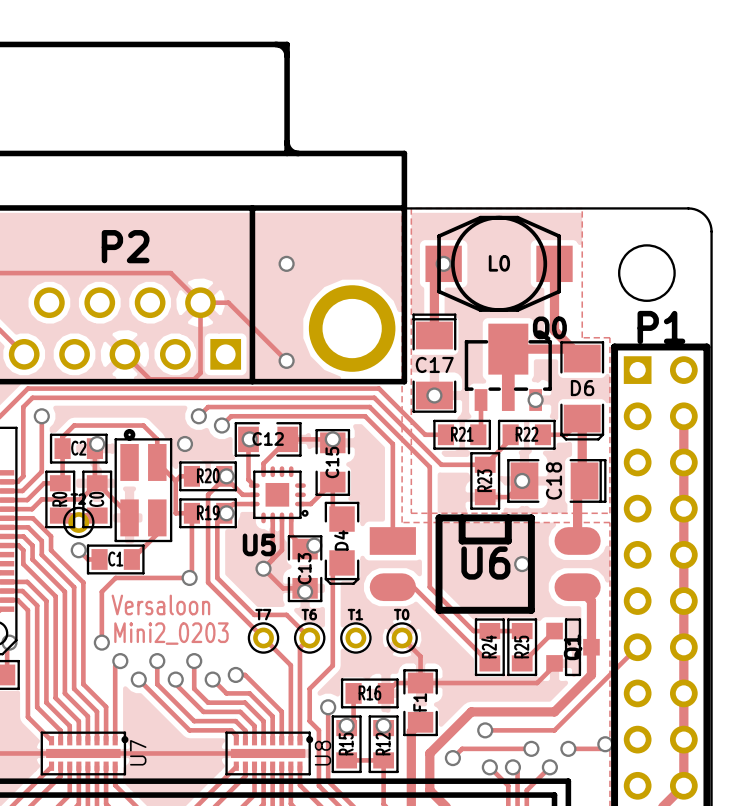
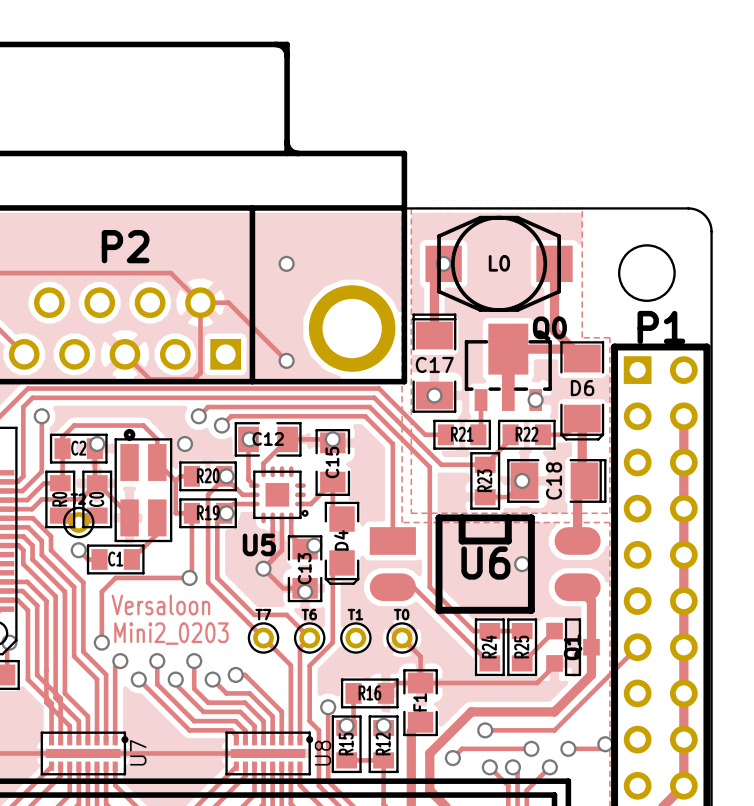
track: (332, 642) (332, 665) (309, 688) -> (332, 642) (309, 665) (309, 688)
track: (83, 651) (83, 684) (106, 706) -> (83, 651) (106, 674) (106, 706)
track: (74, 656) (74, 688) (97, 711) -> (74, 656) (97, 679) (97, 711)
track: (37, 674) (37, 707) (60, 730) -> (37, 674) (60, 698) (60, 730)
track: (27, 679) (27, 717) (51, 740) -> (27, 679) (51, 703) (51, 740)

